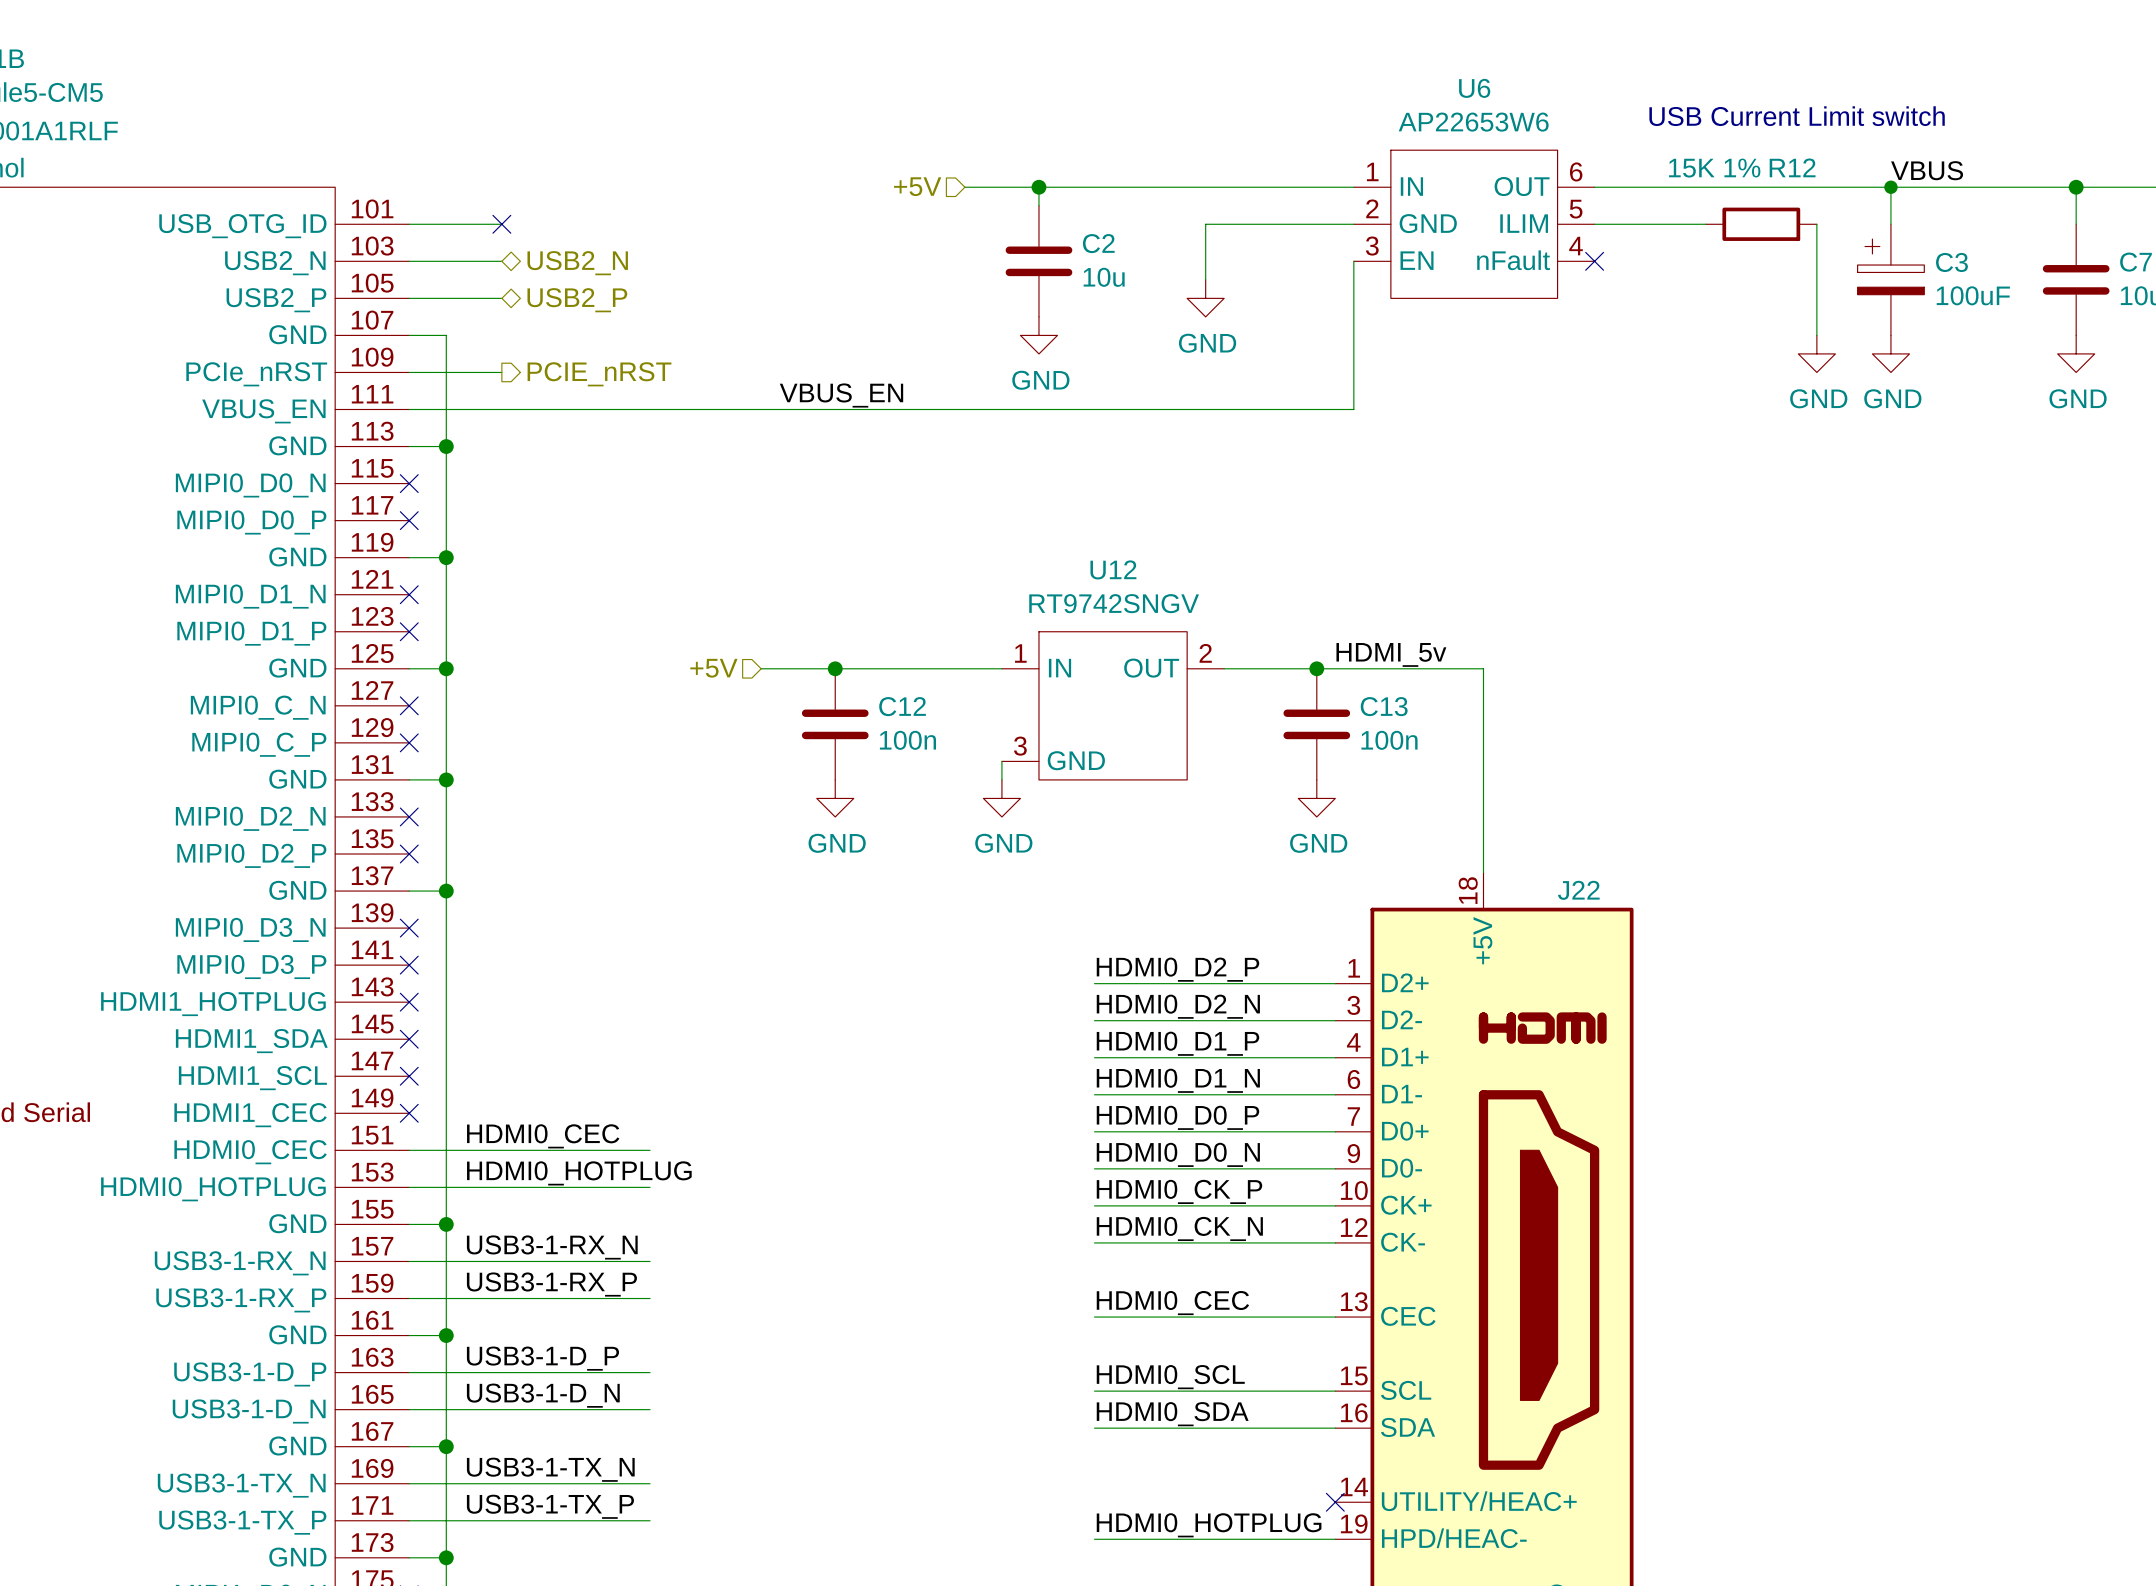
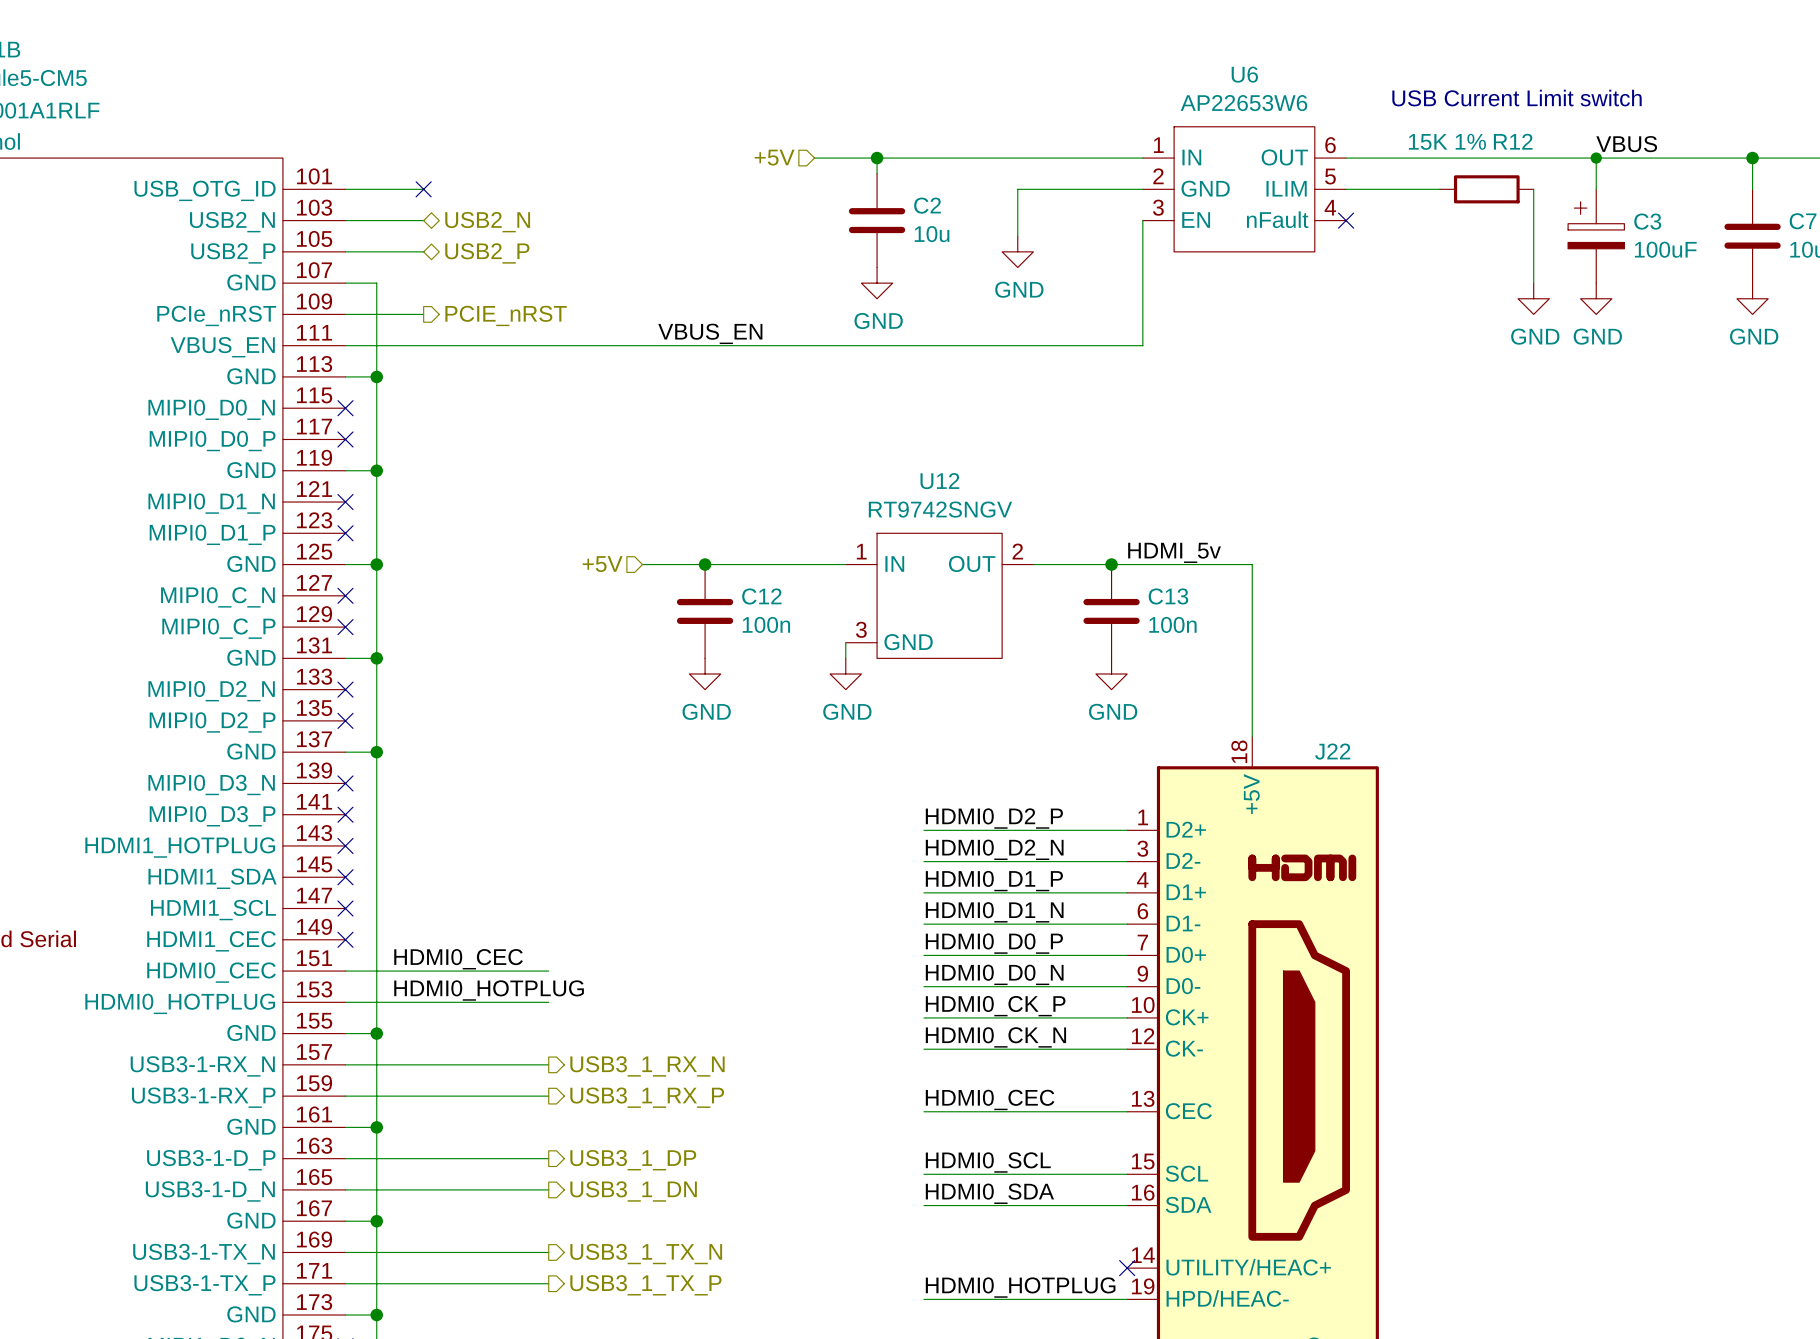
label: USB3-1-RX_N (552, 1247) -> none
hierarchical label: none -> USB3_1_RX_N (647, 1066)
label: USB3-1-RX_P (551, 1284) -> none
hierarchical label: none -> USB3_1_RX_P (647, 1097)
label: USB3-1-D_P (542, 1358) -> none
hierarchical label: none -> USB3_1_DP (633, 1160)
label: USB3-1-D_N (543, 1395) -> none
hierarchical label: none -> USB3_1_DN (633, 1191)
label: USB3-1-TX_N (550, 1469) -> none
hierarchical label: none -> USB3_1_TX_N (646, 1254)
label: USB3-1-TX_P (550, 1506) -> none
hierarchical label: none -> USB3_1_TX_P (645, 1285)

